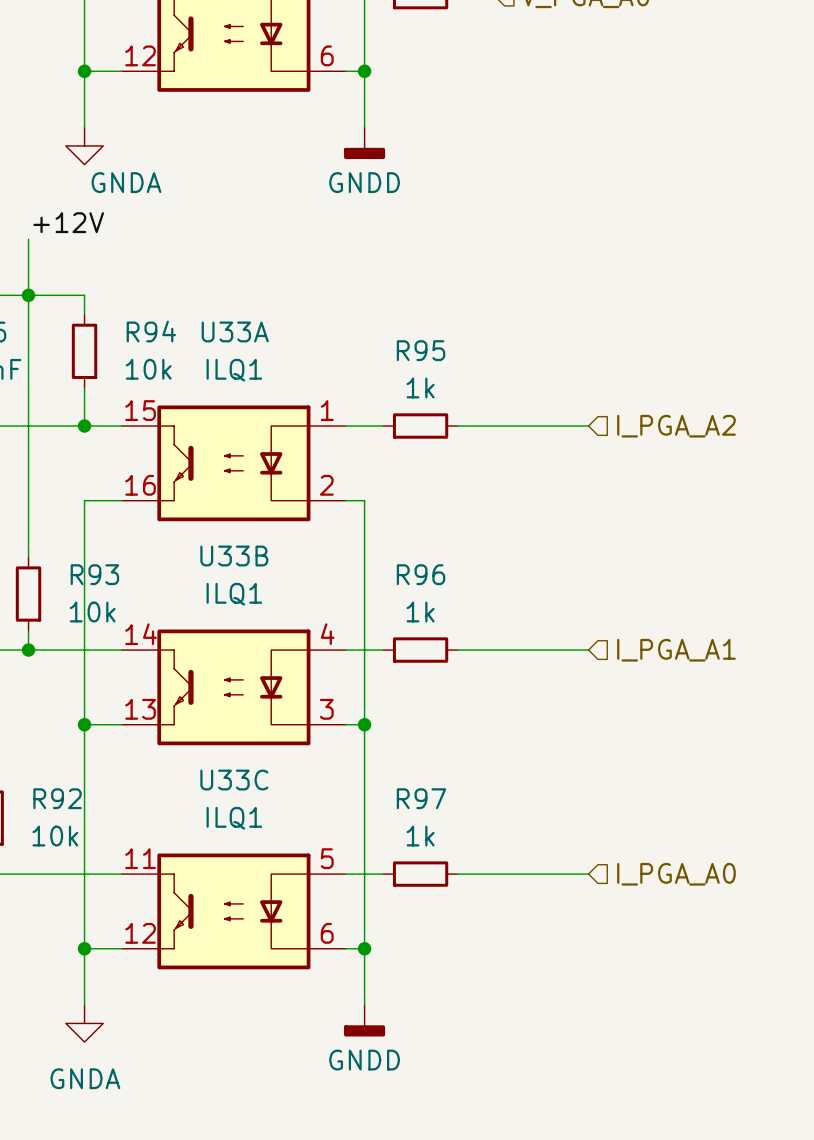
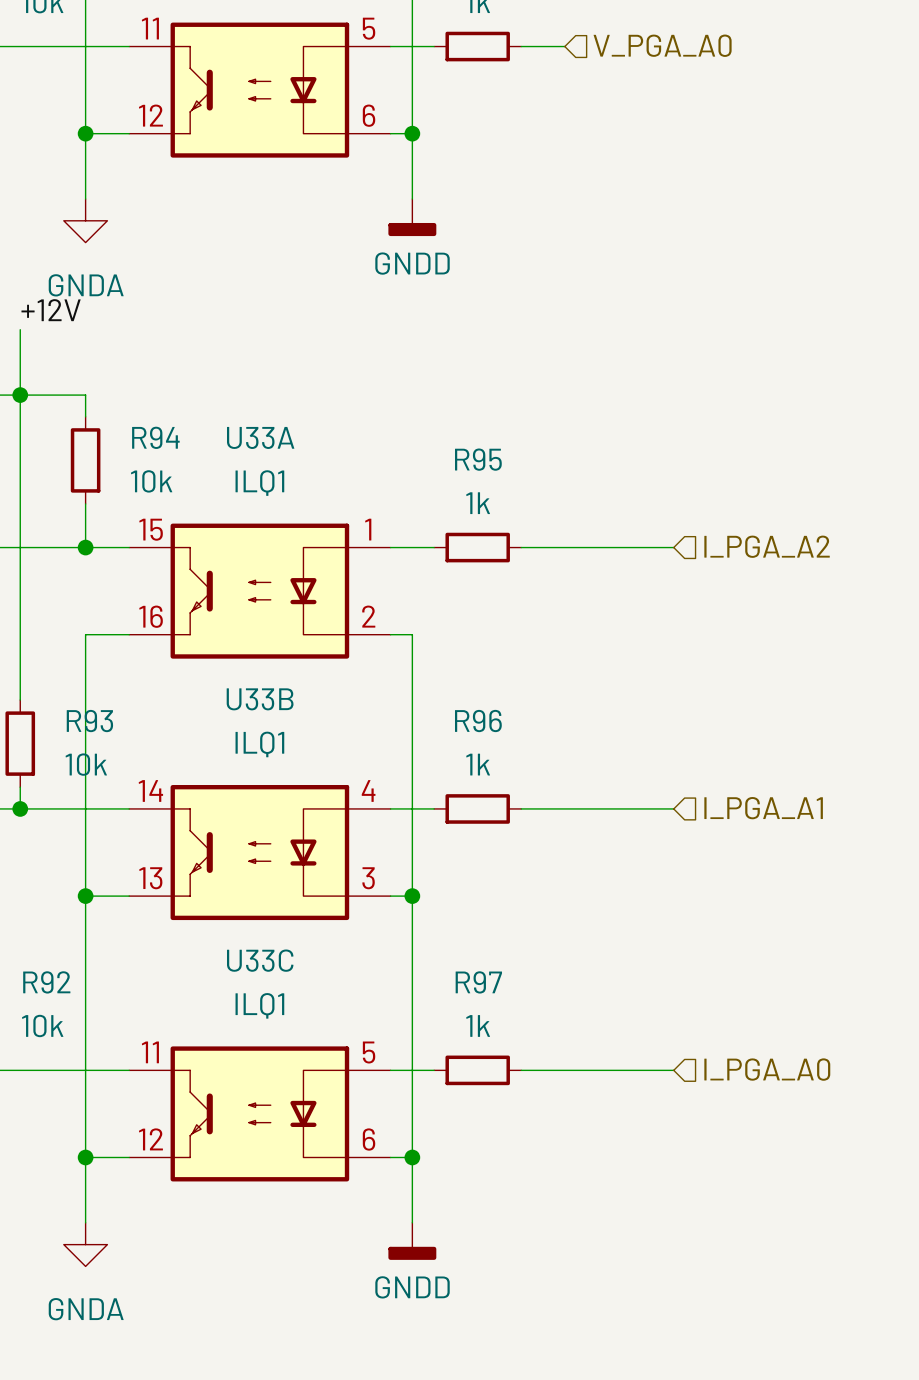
power symbol text position: GNDA (126, 182) -> GNDA (86, 285)

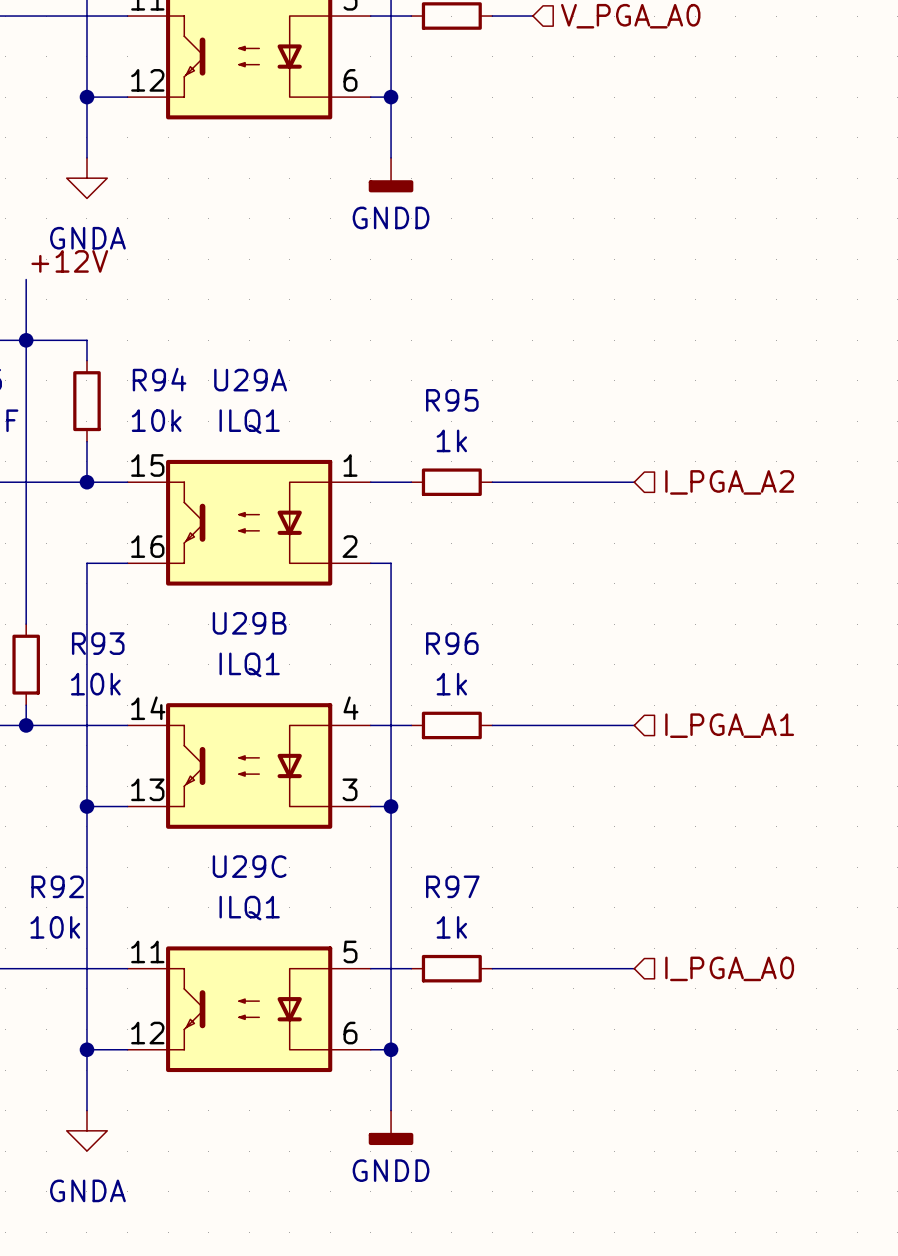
U33A name: U33A (260, 437) -> U29A (250, 380)
U33B name: U33B (260, 699) -> U29B (249, 623)
U33C name: U33C (260, 960) -> U29C (249, 866)

